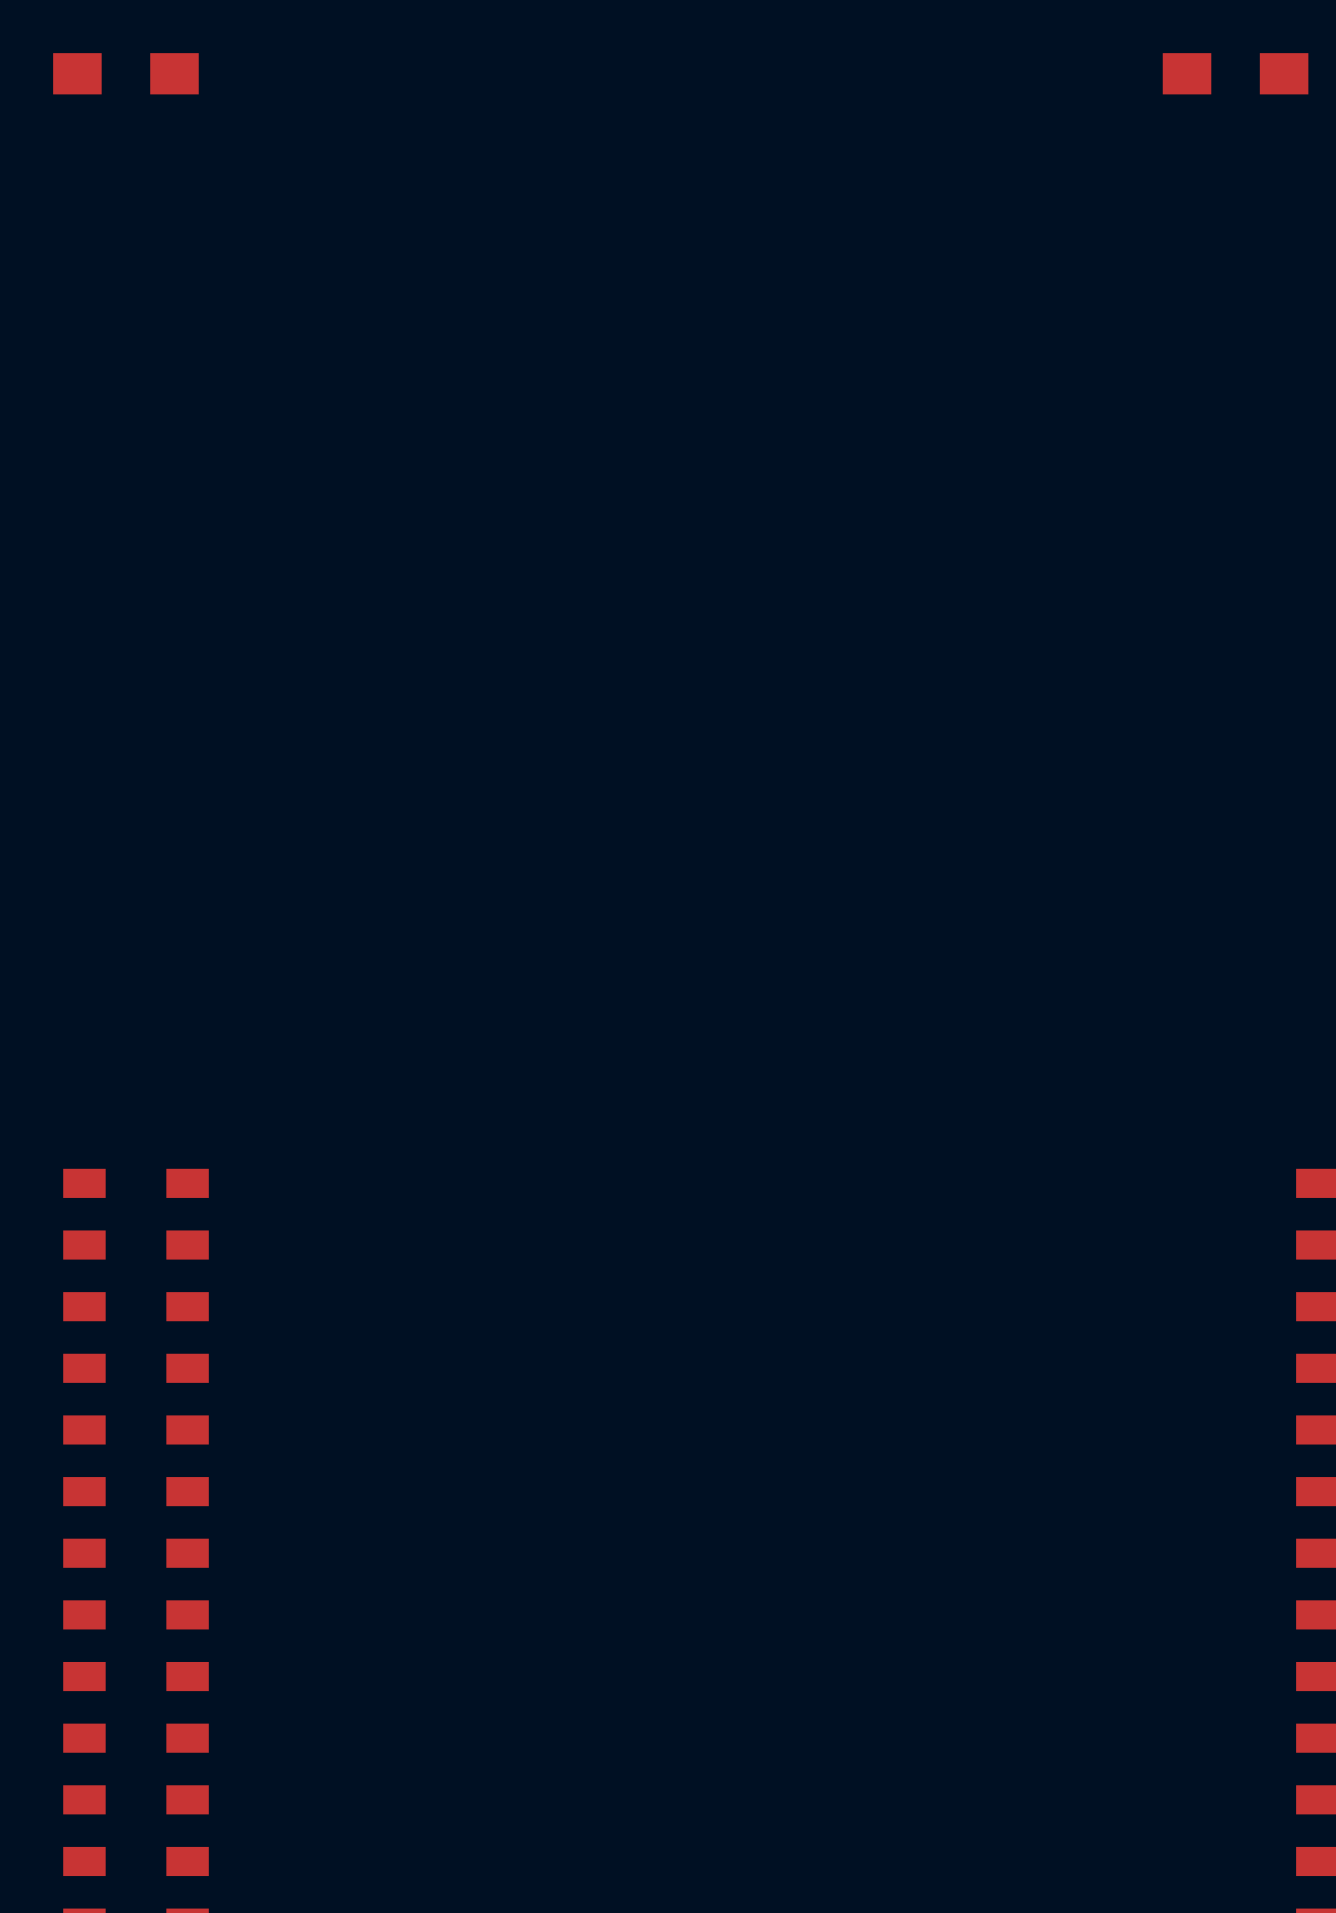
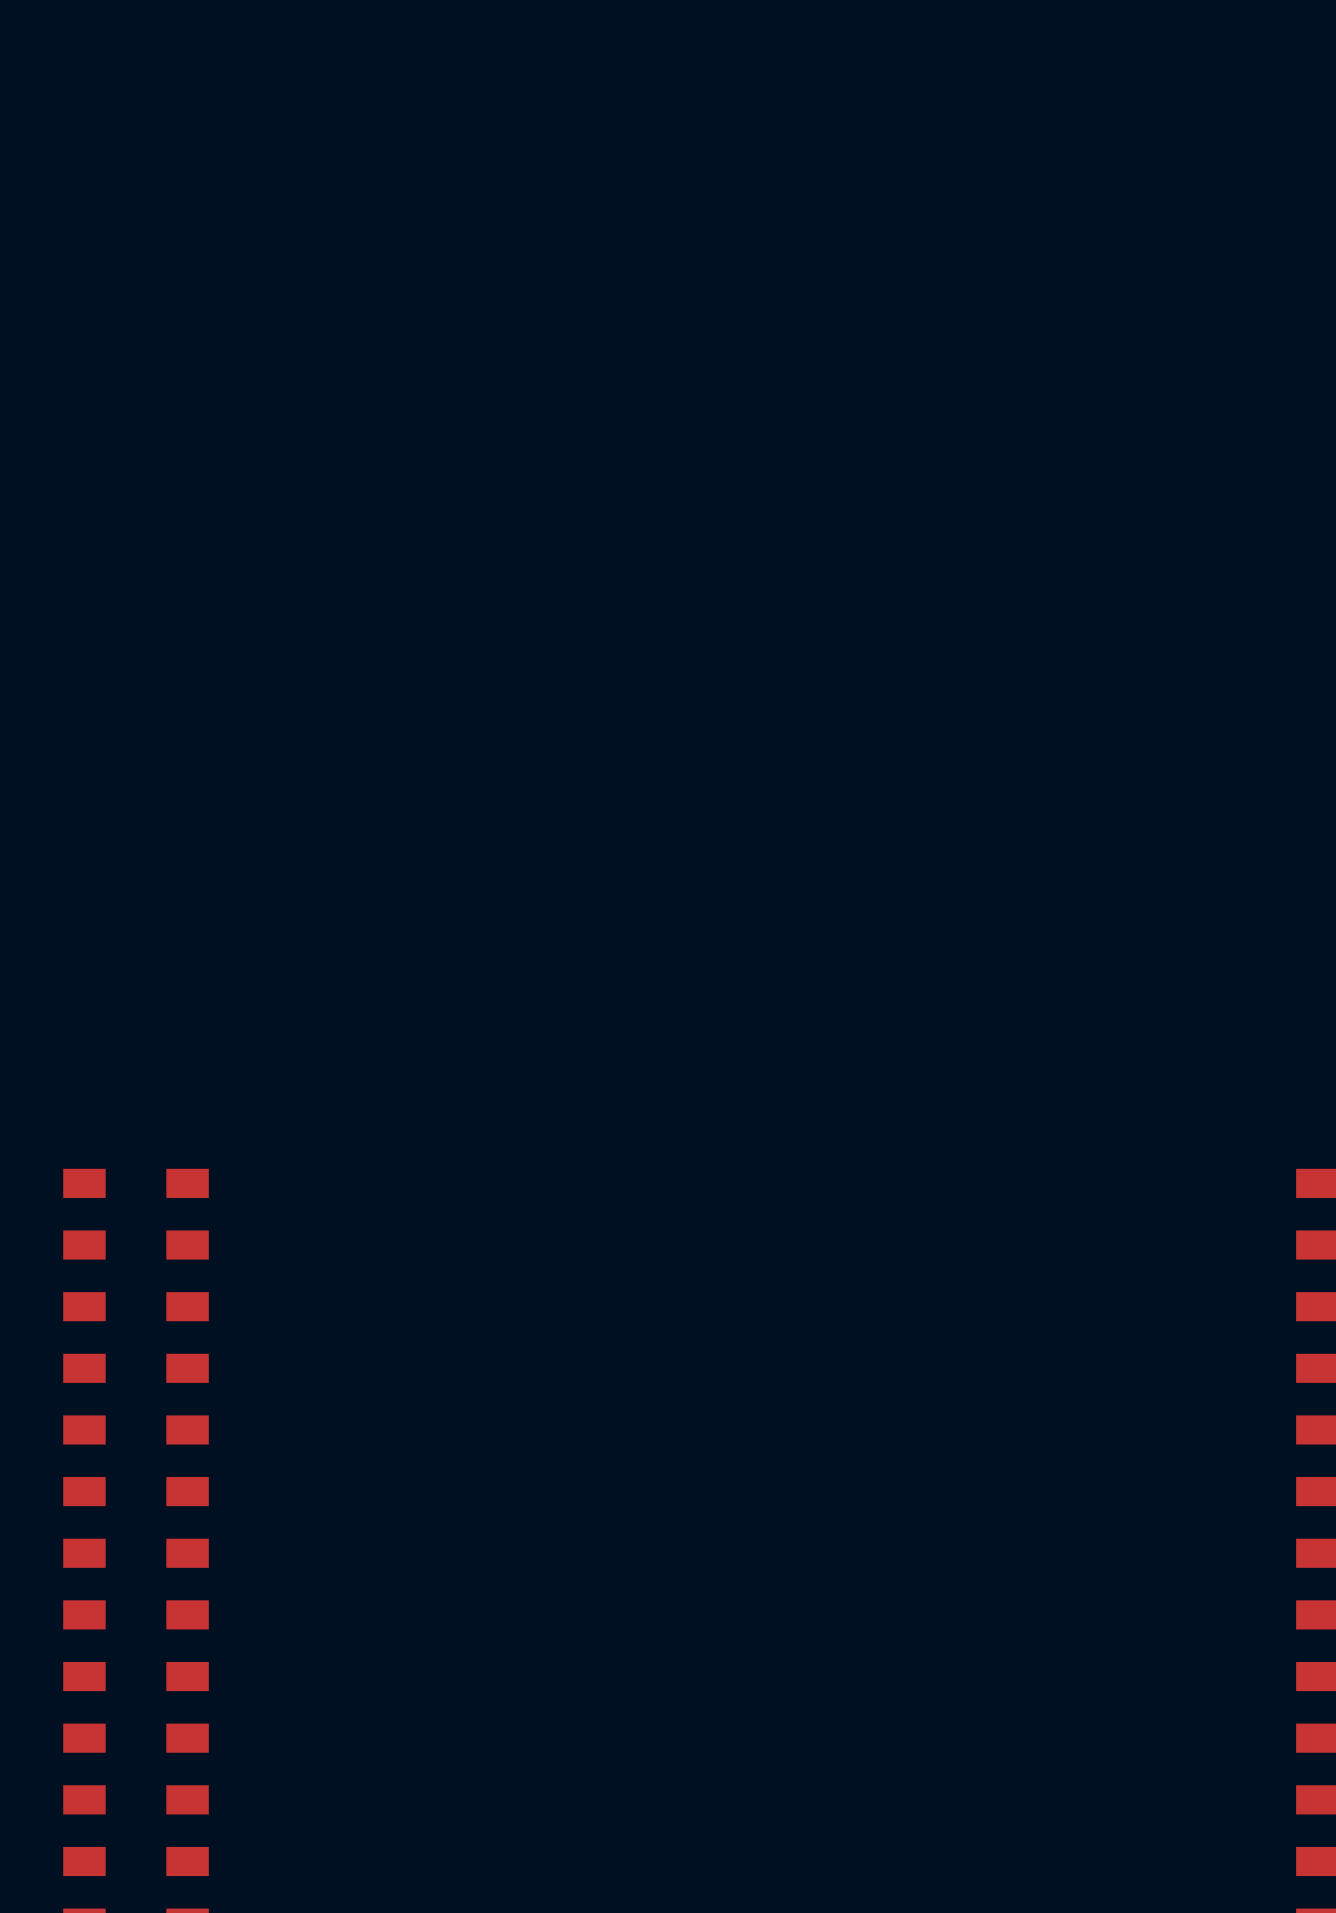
part: (125, 73) -> none
part: (1235, 73) -> none

